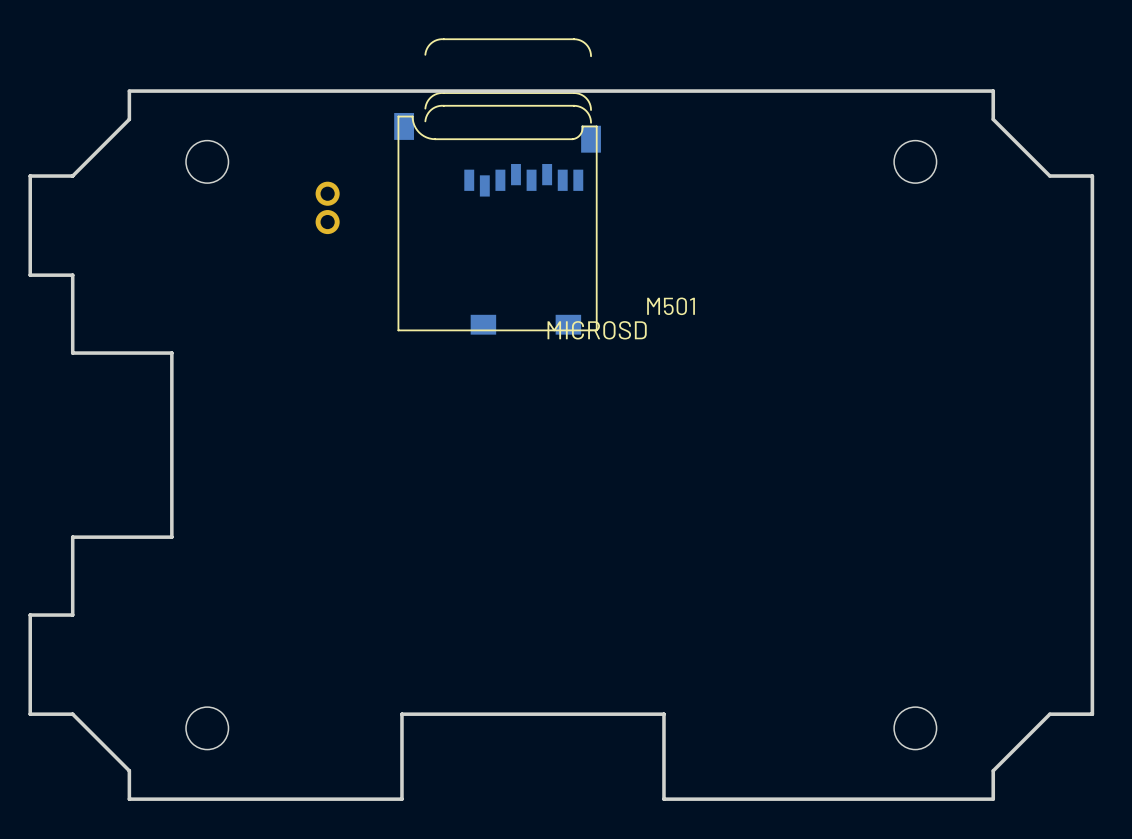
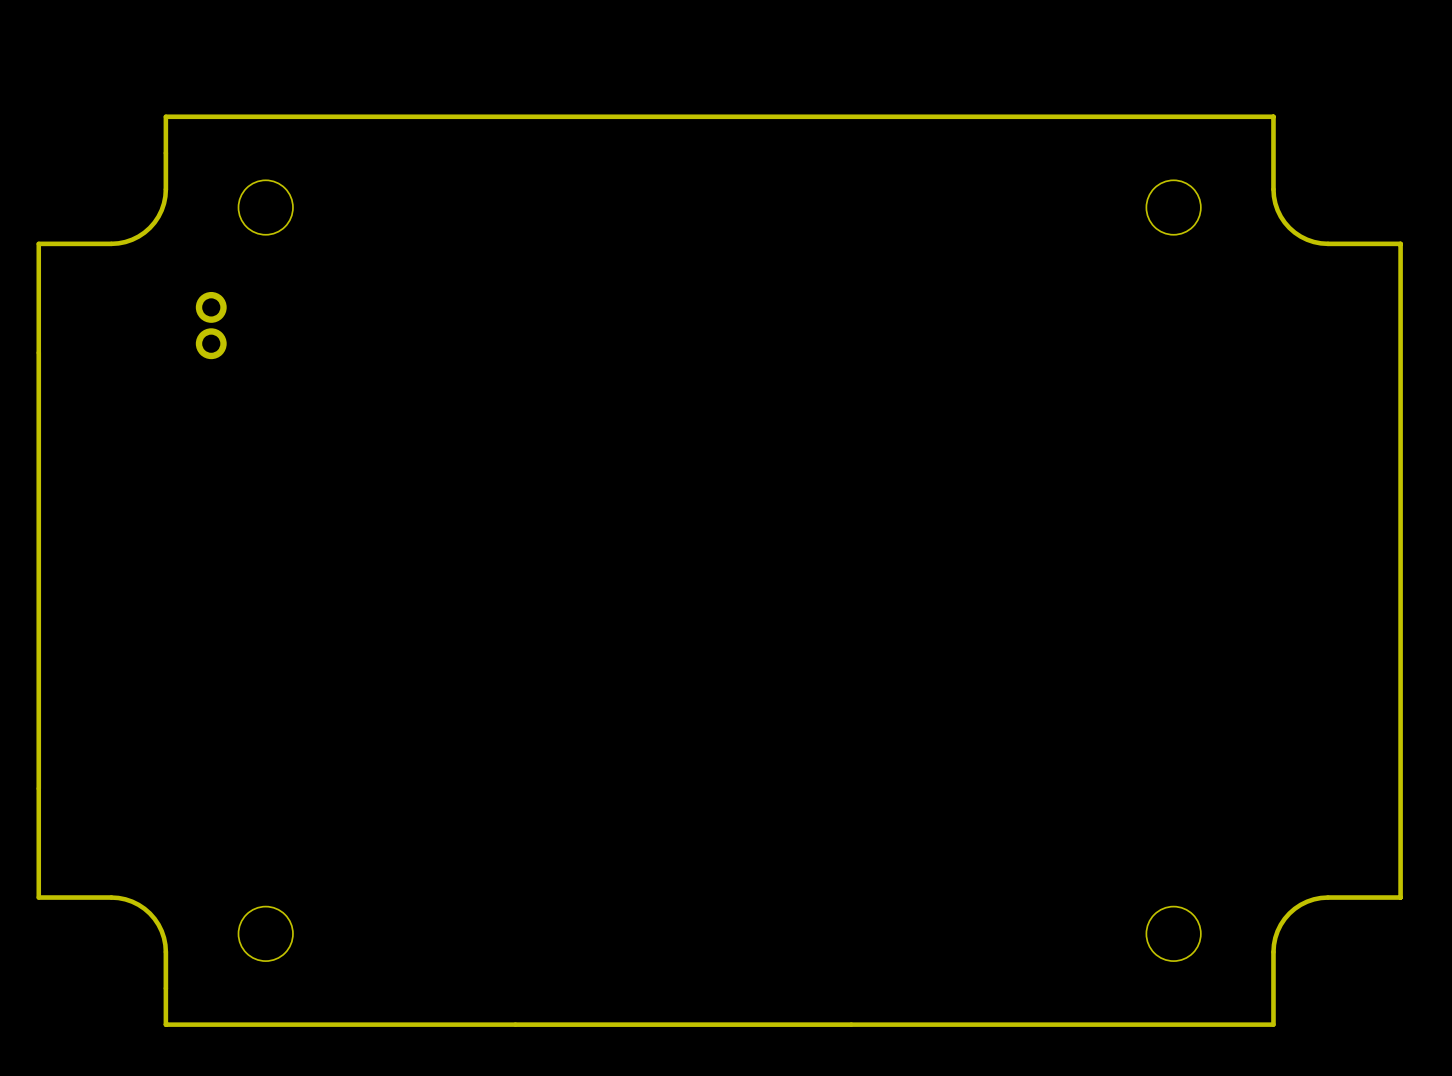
board edge: (129, 119) (72, 176) (30, 176) (30, 190) -> (165, 153) (164, 203) (158, 216) (144, 232) (132, 239) (118, 243) (38, 243)
board edge: (993, 119) (1049, 176) (1092, 176) (1092, 190) -> (1273, 153) (1275, 203) (1284, 222) (1294, 232) (1307, 239) (1320, 243) (1400, 243)
M501: MICROSD (497, 186) -> none
part position: (327, 207) -> (211, 325)
board edge: (30, 275) (72, 275) (72, 353) (171, 353) (171, 537) (72, 537) (72, 615) (30, 615) -> (38, 352) (38, 788)
board edge: (30, 700) (30, 714) (72, 714) (129, 770) -> (38, 897) (118, 898) (132, 901) (144, 908) (158, 924) (164, 937) (165, 988)
board edge: (1092, 700) (1092, 714) (1049, 714) (993, 770) -> (1400, 897) (1320, 898) (1307, 901) (1294, 908) (1280, 924) (1275, 937) (1273, 988)
board edge: (663, 799) (663, 714) (401, 714) (401, 799) -> (851, 1024) (515, 1024)

